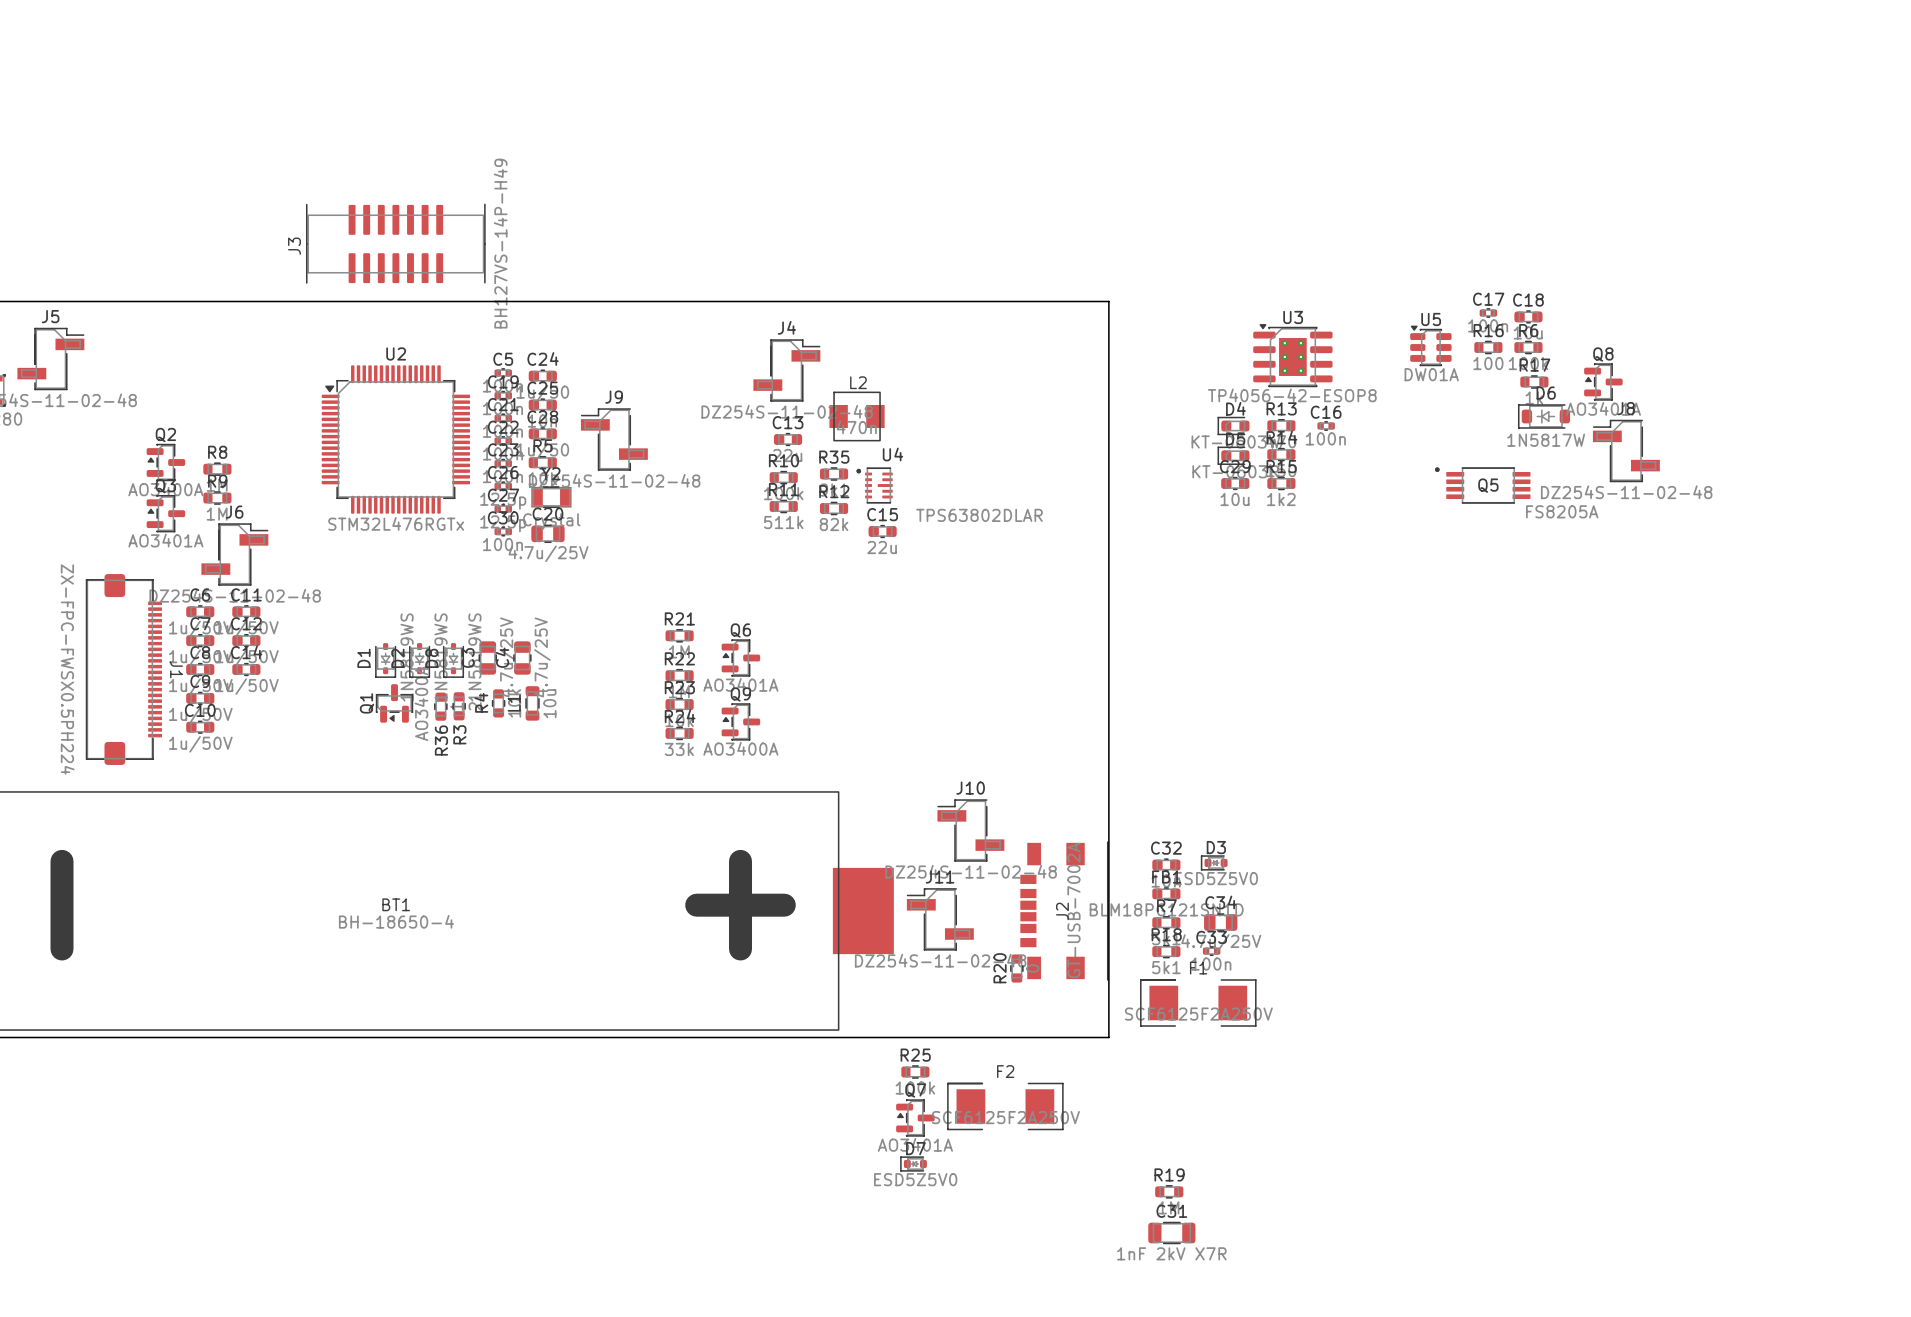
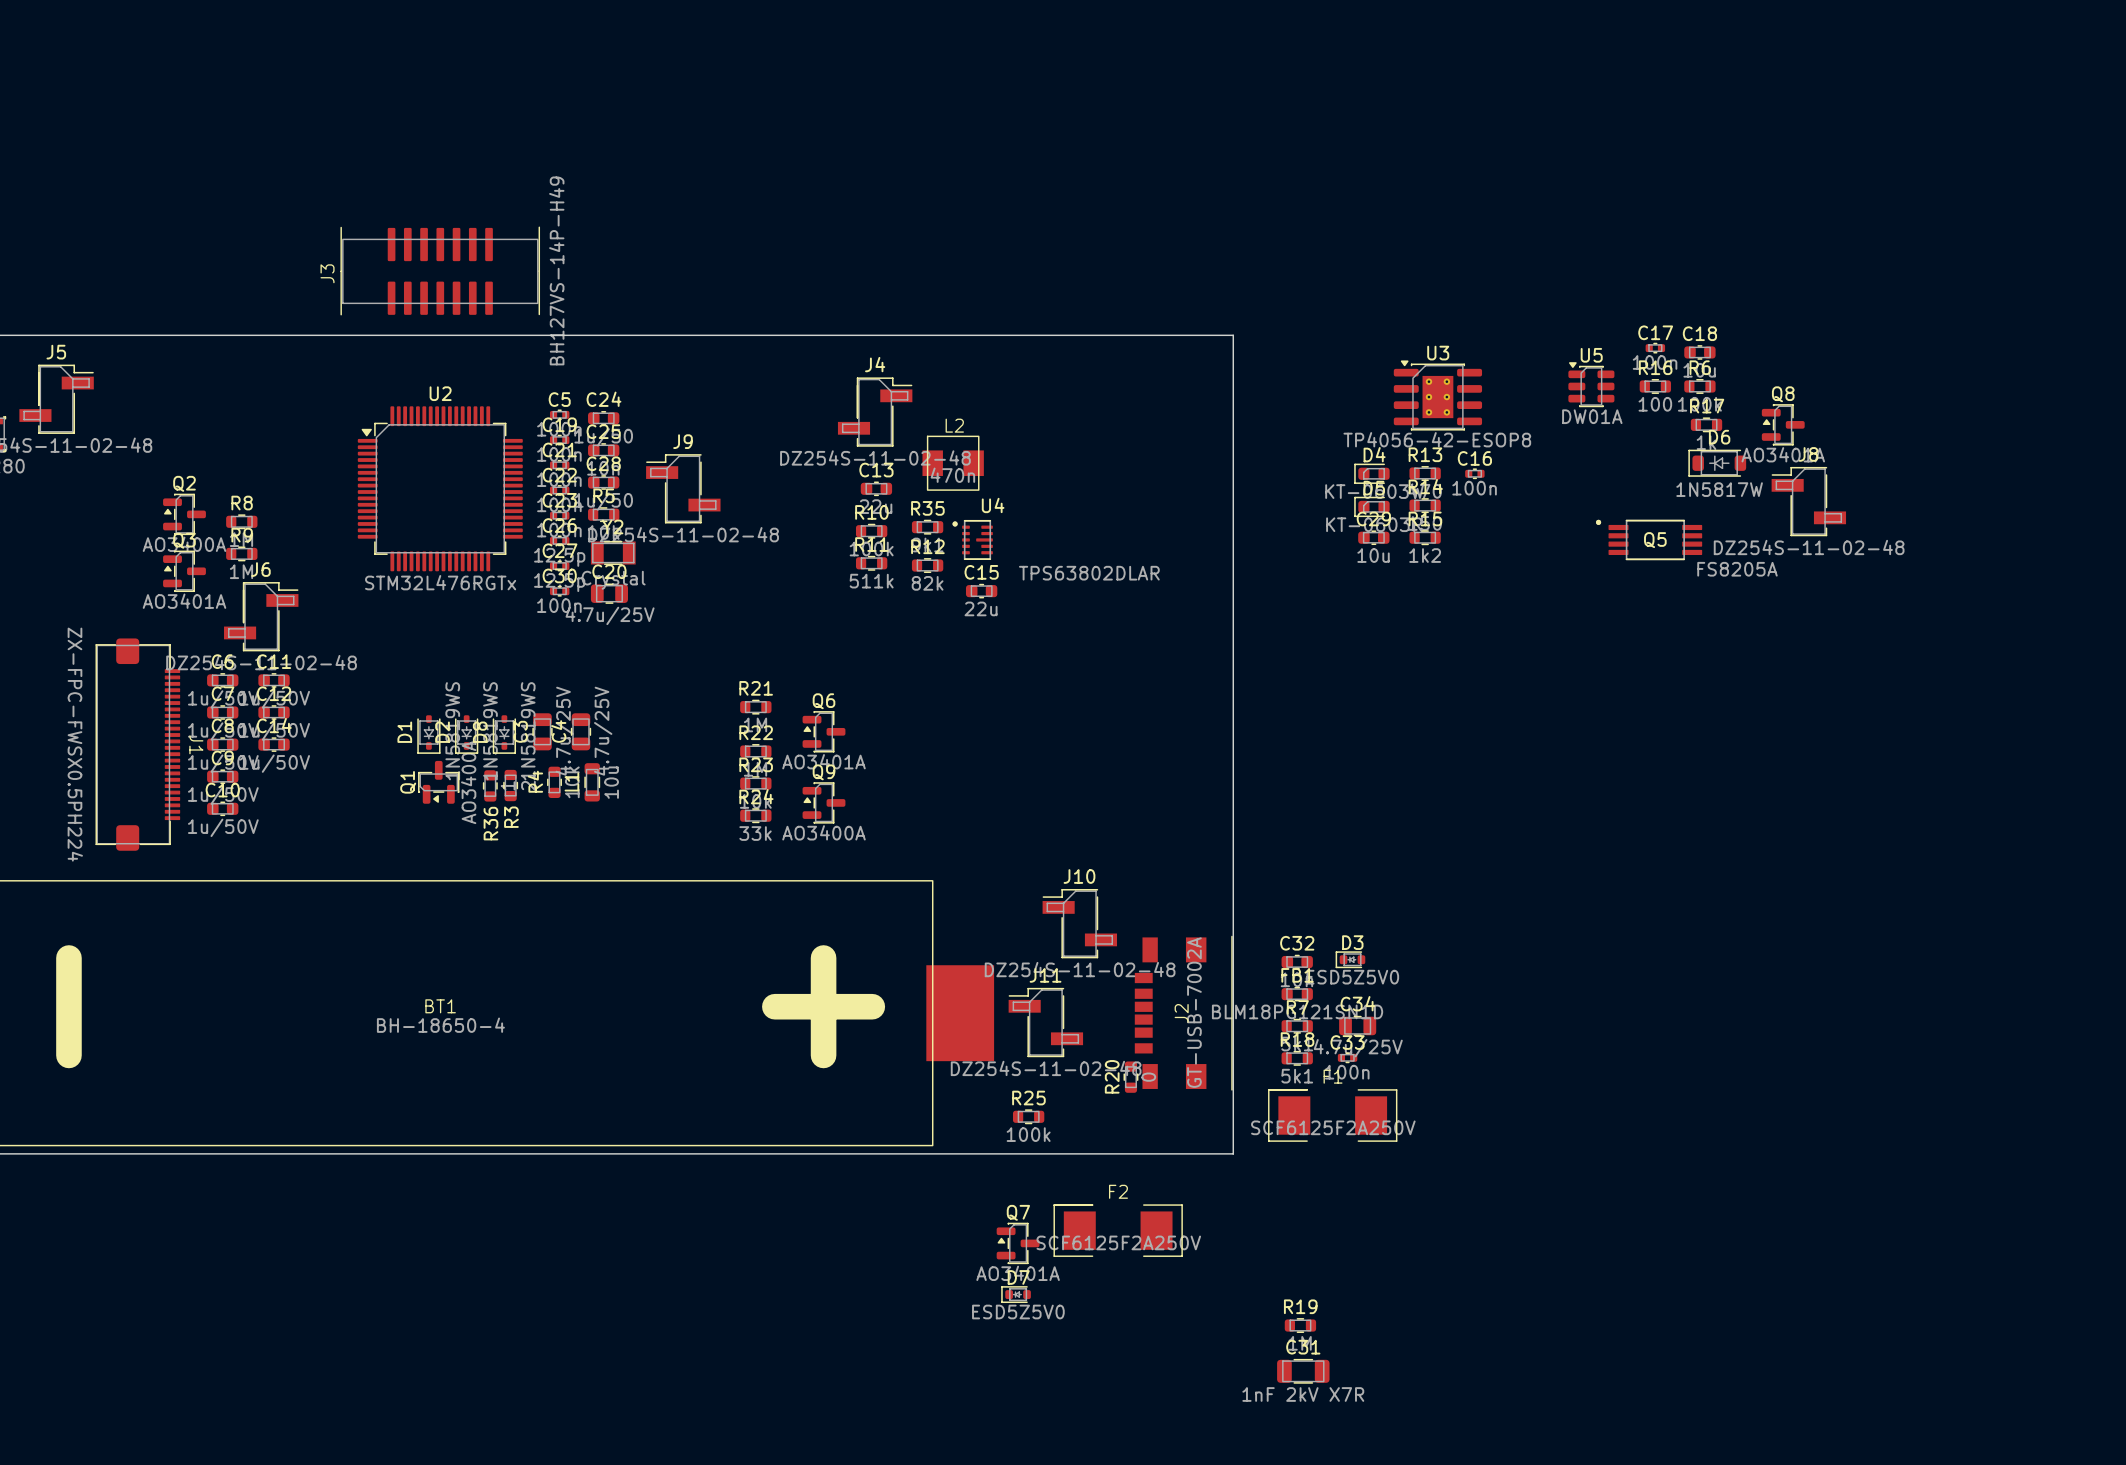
R25 position: (915, 1072) -> (1028, 1116)

